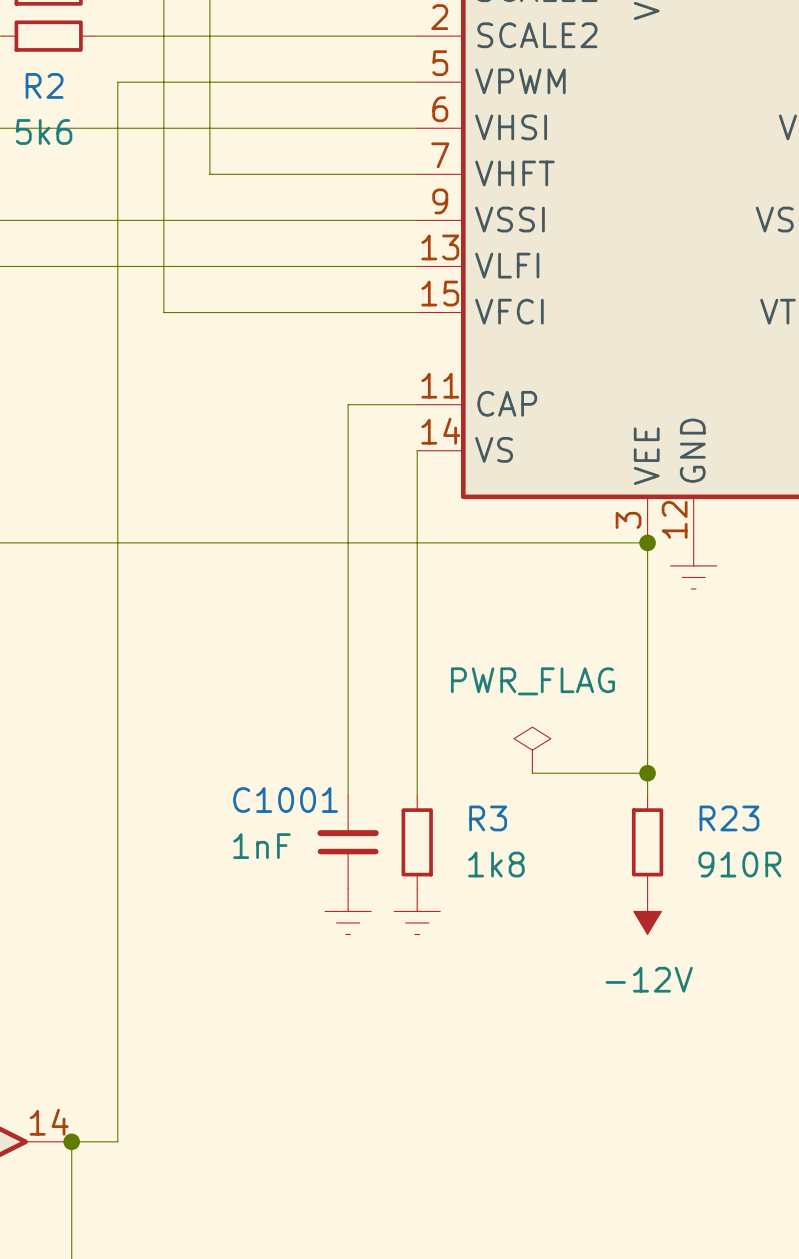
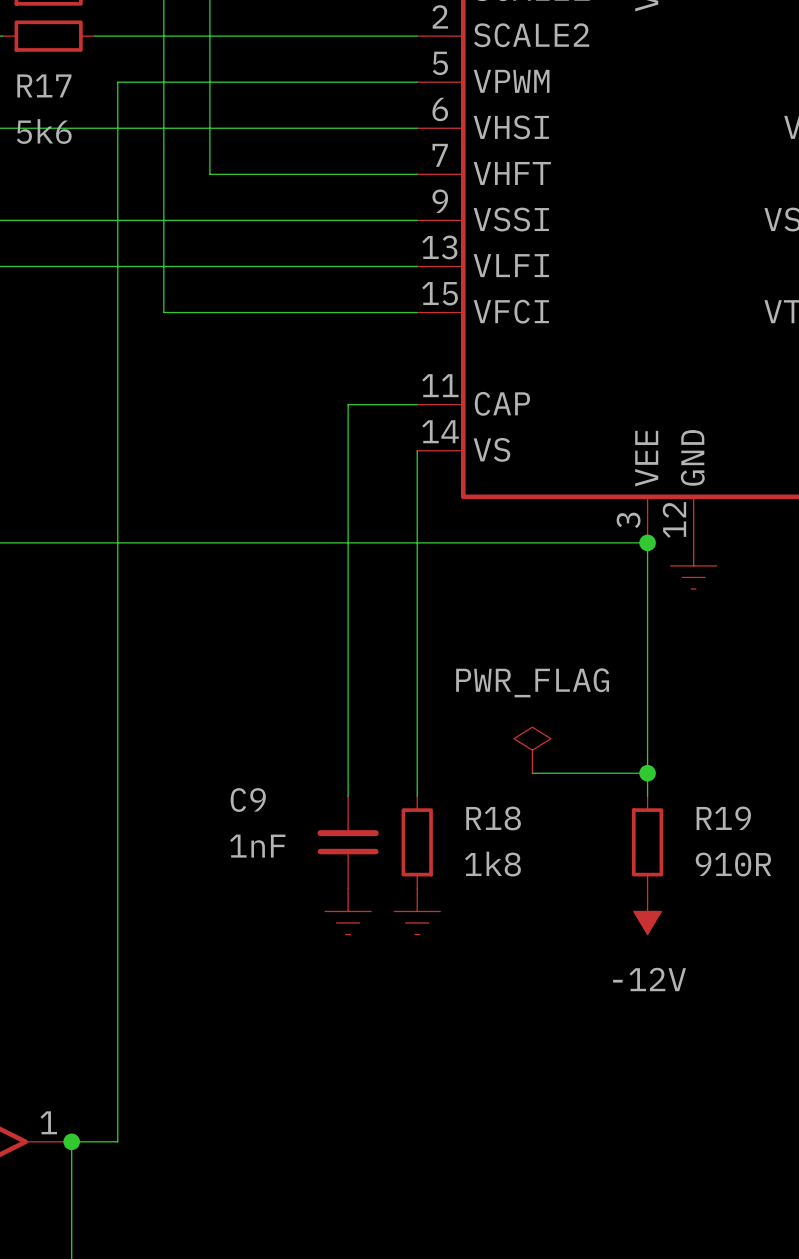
R2 name: R2 (44, 85) -> R17 (44, 85)
C1001 name: C1001 (285, 800) -> C9 (248, 800)
R3 name: R3 (488, 818) -> R18 (493, 818)
R23 name: R23 (729, 818) -> R19 (723, 818)
part pin number: 14 (49, 1122) -> 1 (48, 1122)

